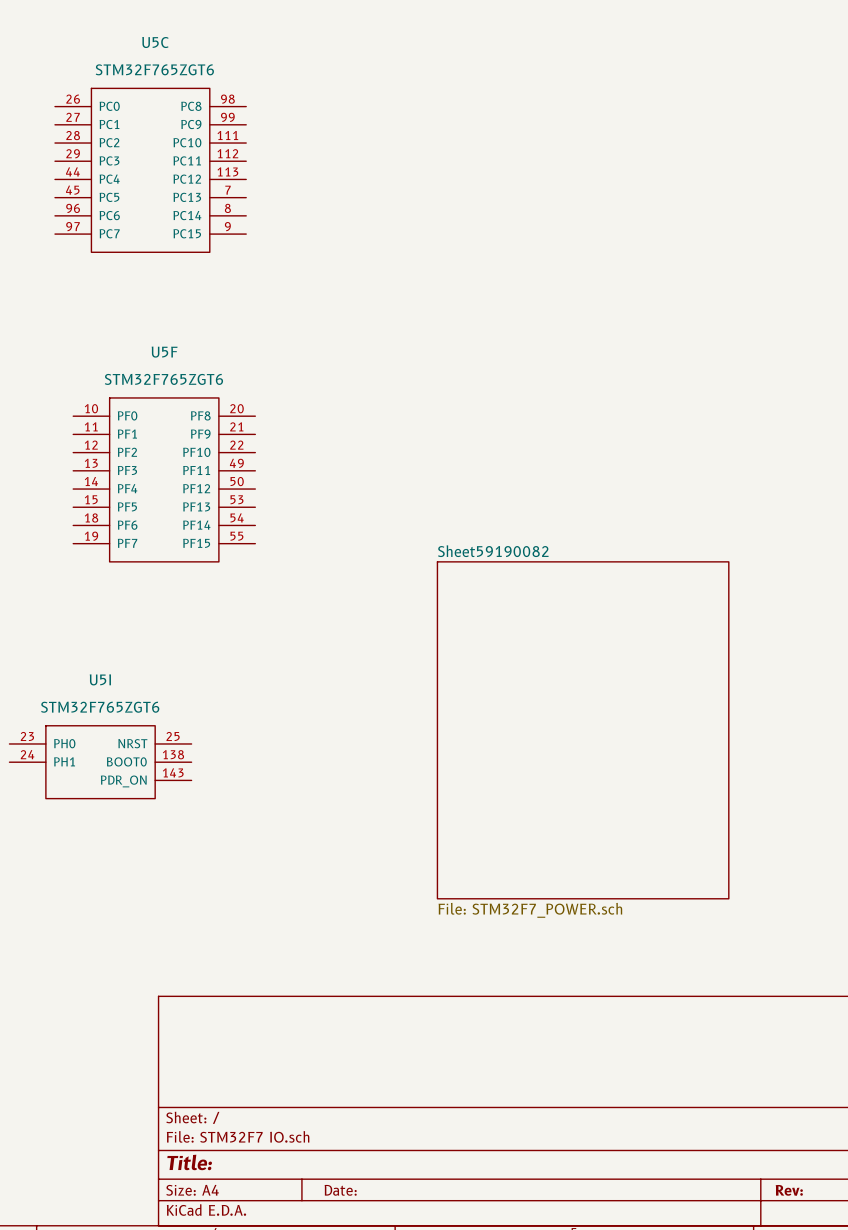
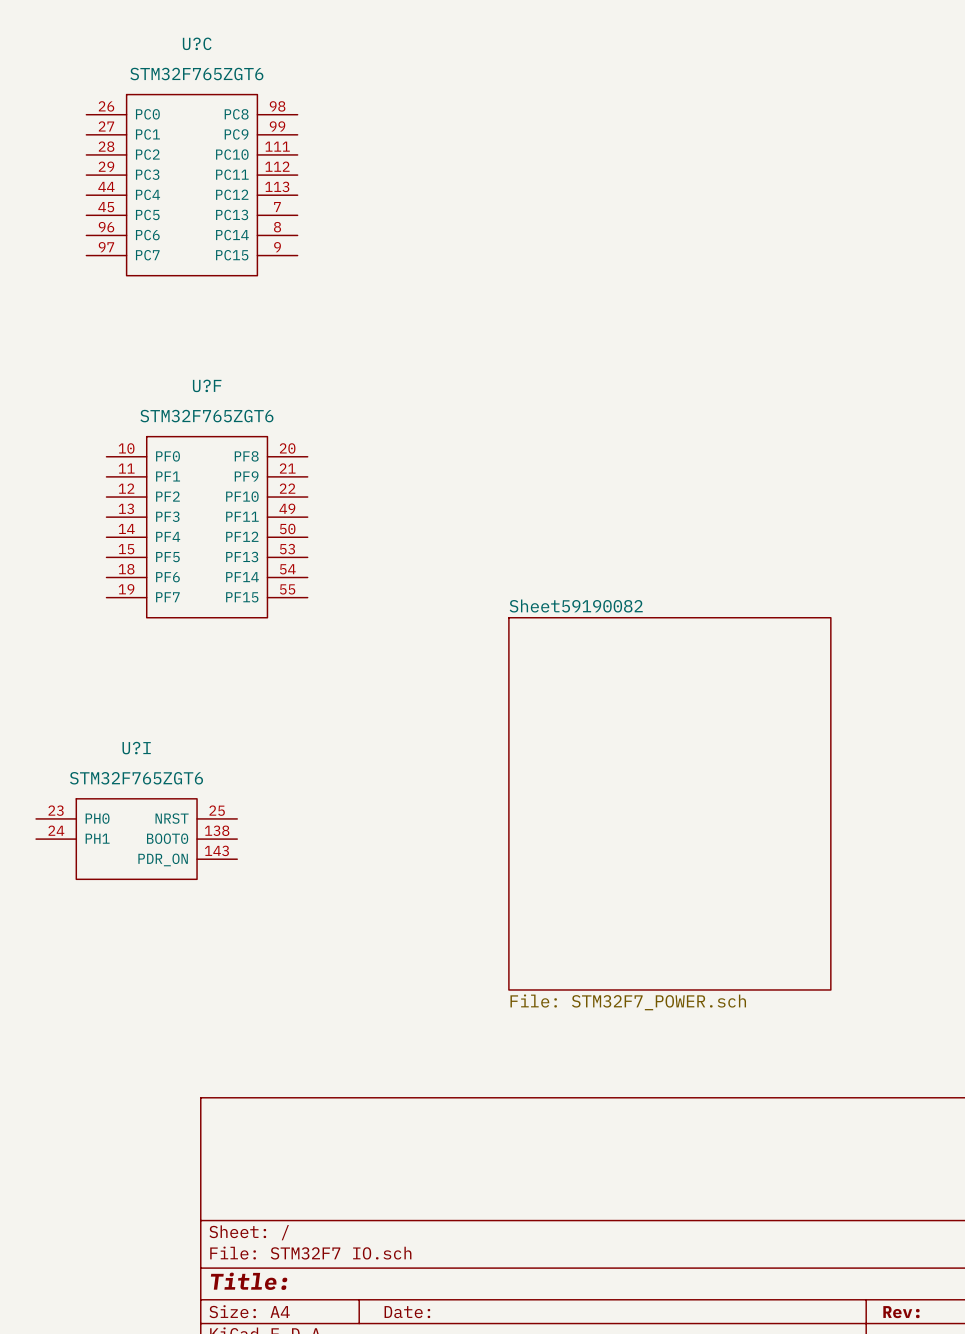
U5C name: U5C (155, 42) -> U?C (197, 43)
U5F name: U5F (164, 352) -> U?F (207, 385)
U5I name: U5I (100, 679) -> U?I (136, 748)

